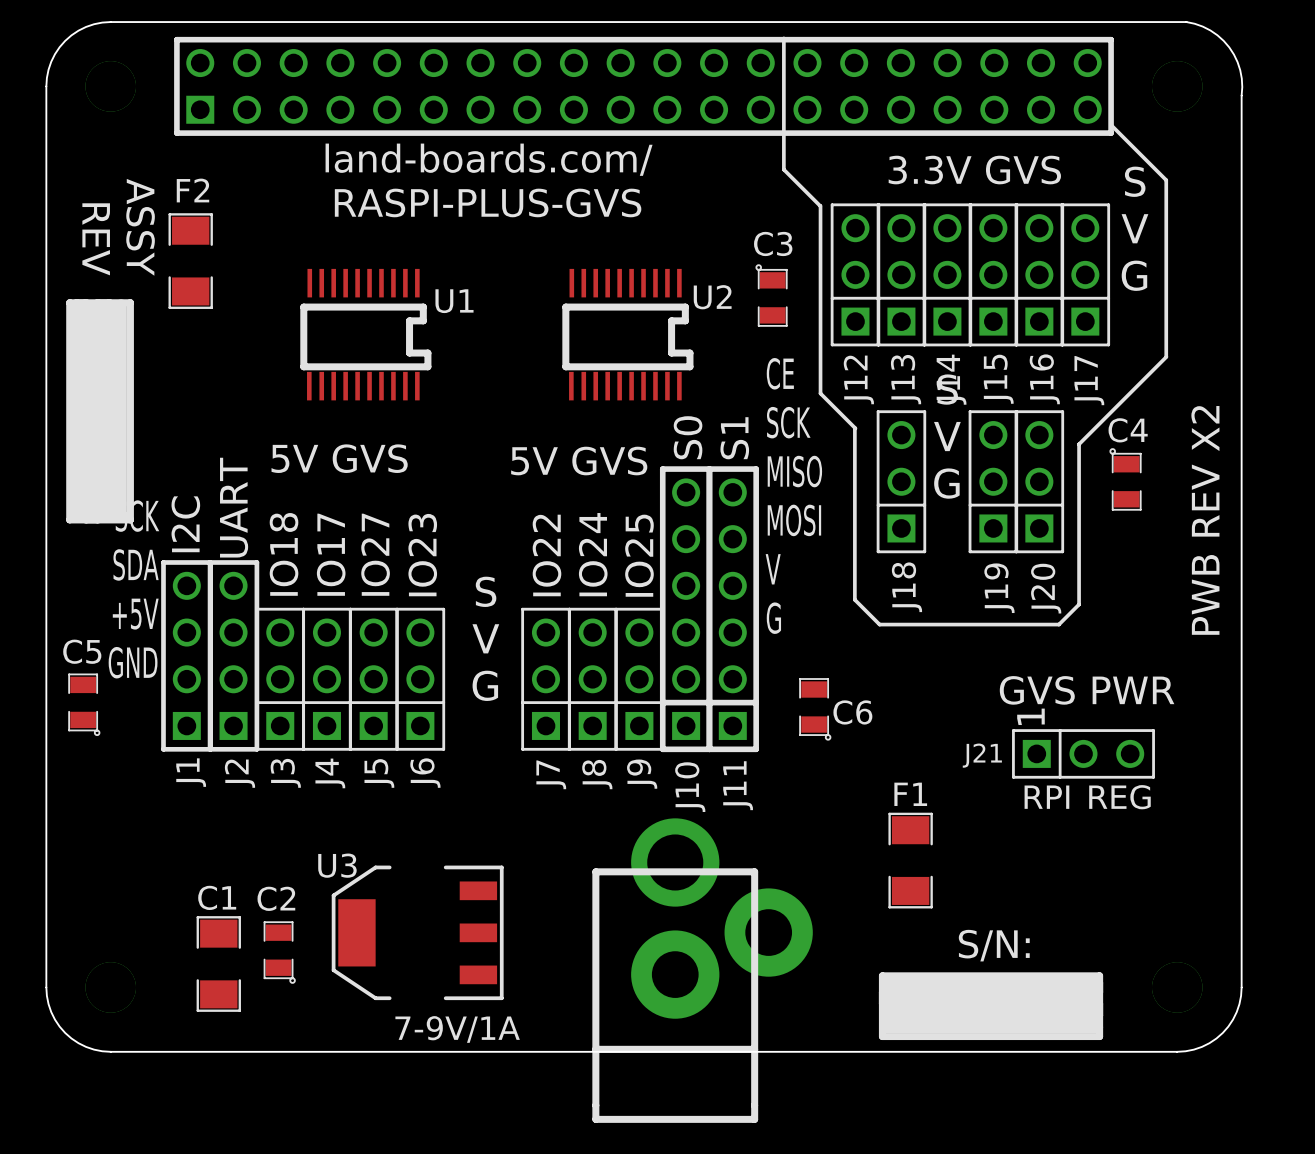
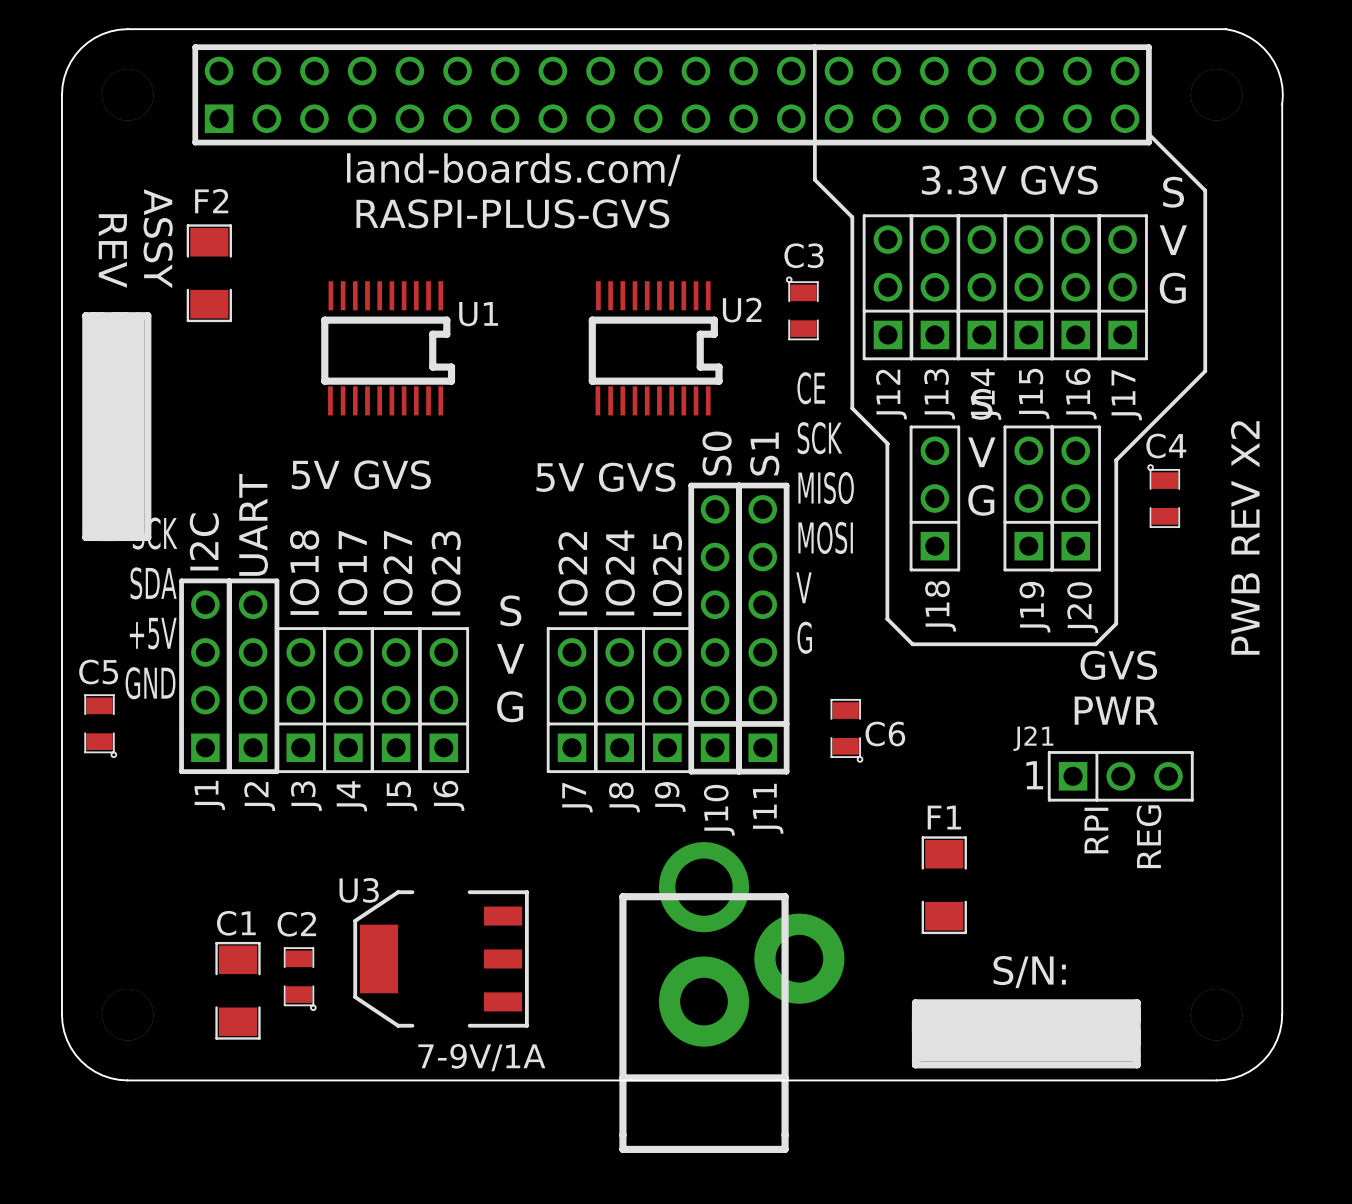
text: none -> GVS (1118, 665)
text: none -> PWR (1116, 710)
text: GVS PWR (1087, 690) -> none
text rotation: 0° (1030, 716) -> 90° clockwise (1034, 775)
J21 name position: J21 (982, 755) -> J21 (1033, 738)
text rotation: 0° (1046, 797) -> 90° counterclockwise (1096, 830)
text rotation: 0° (1119, 797) -> 90° counterclockwise (1148, 836)

